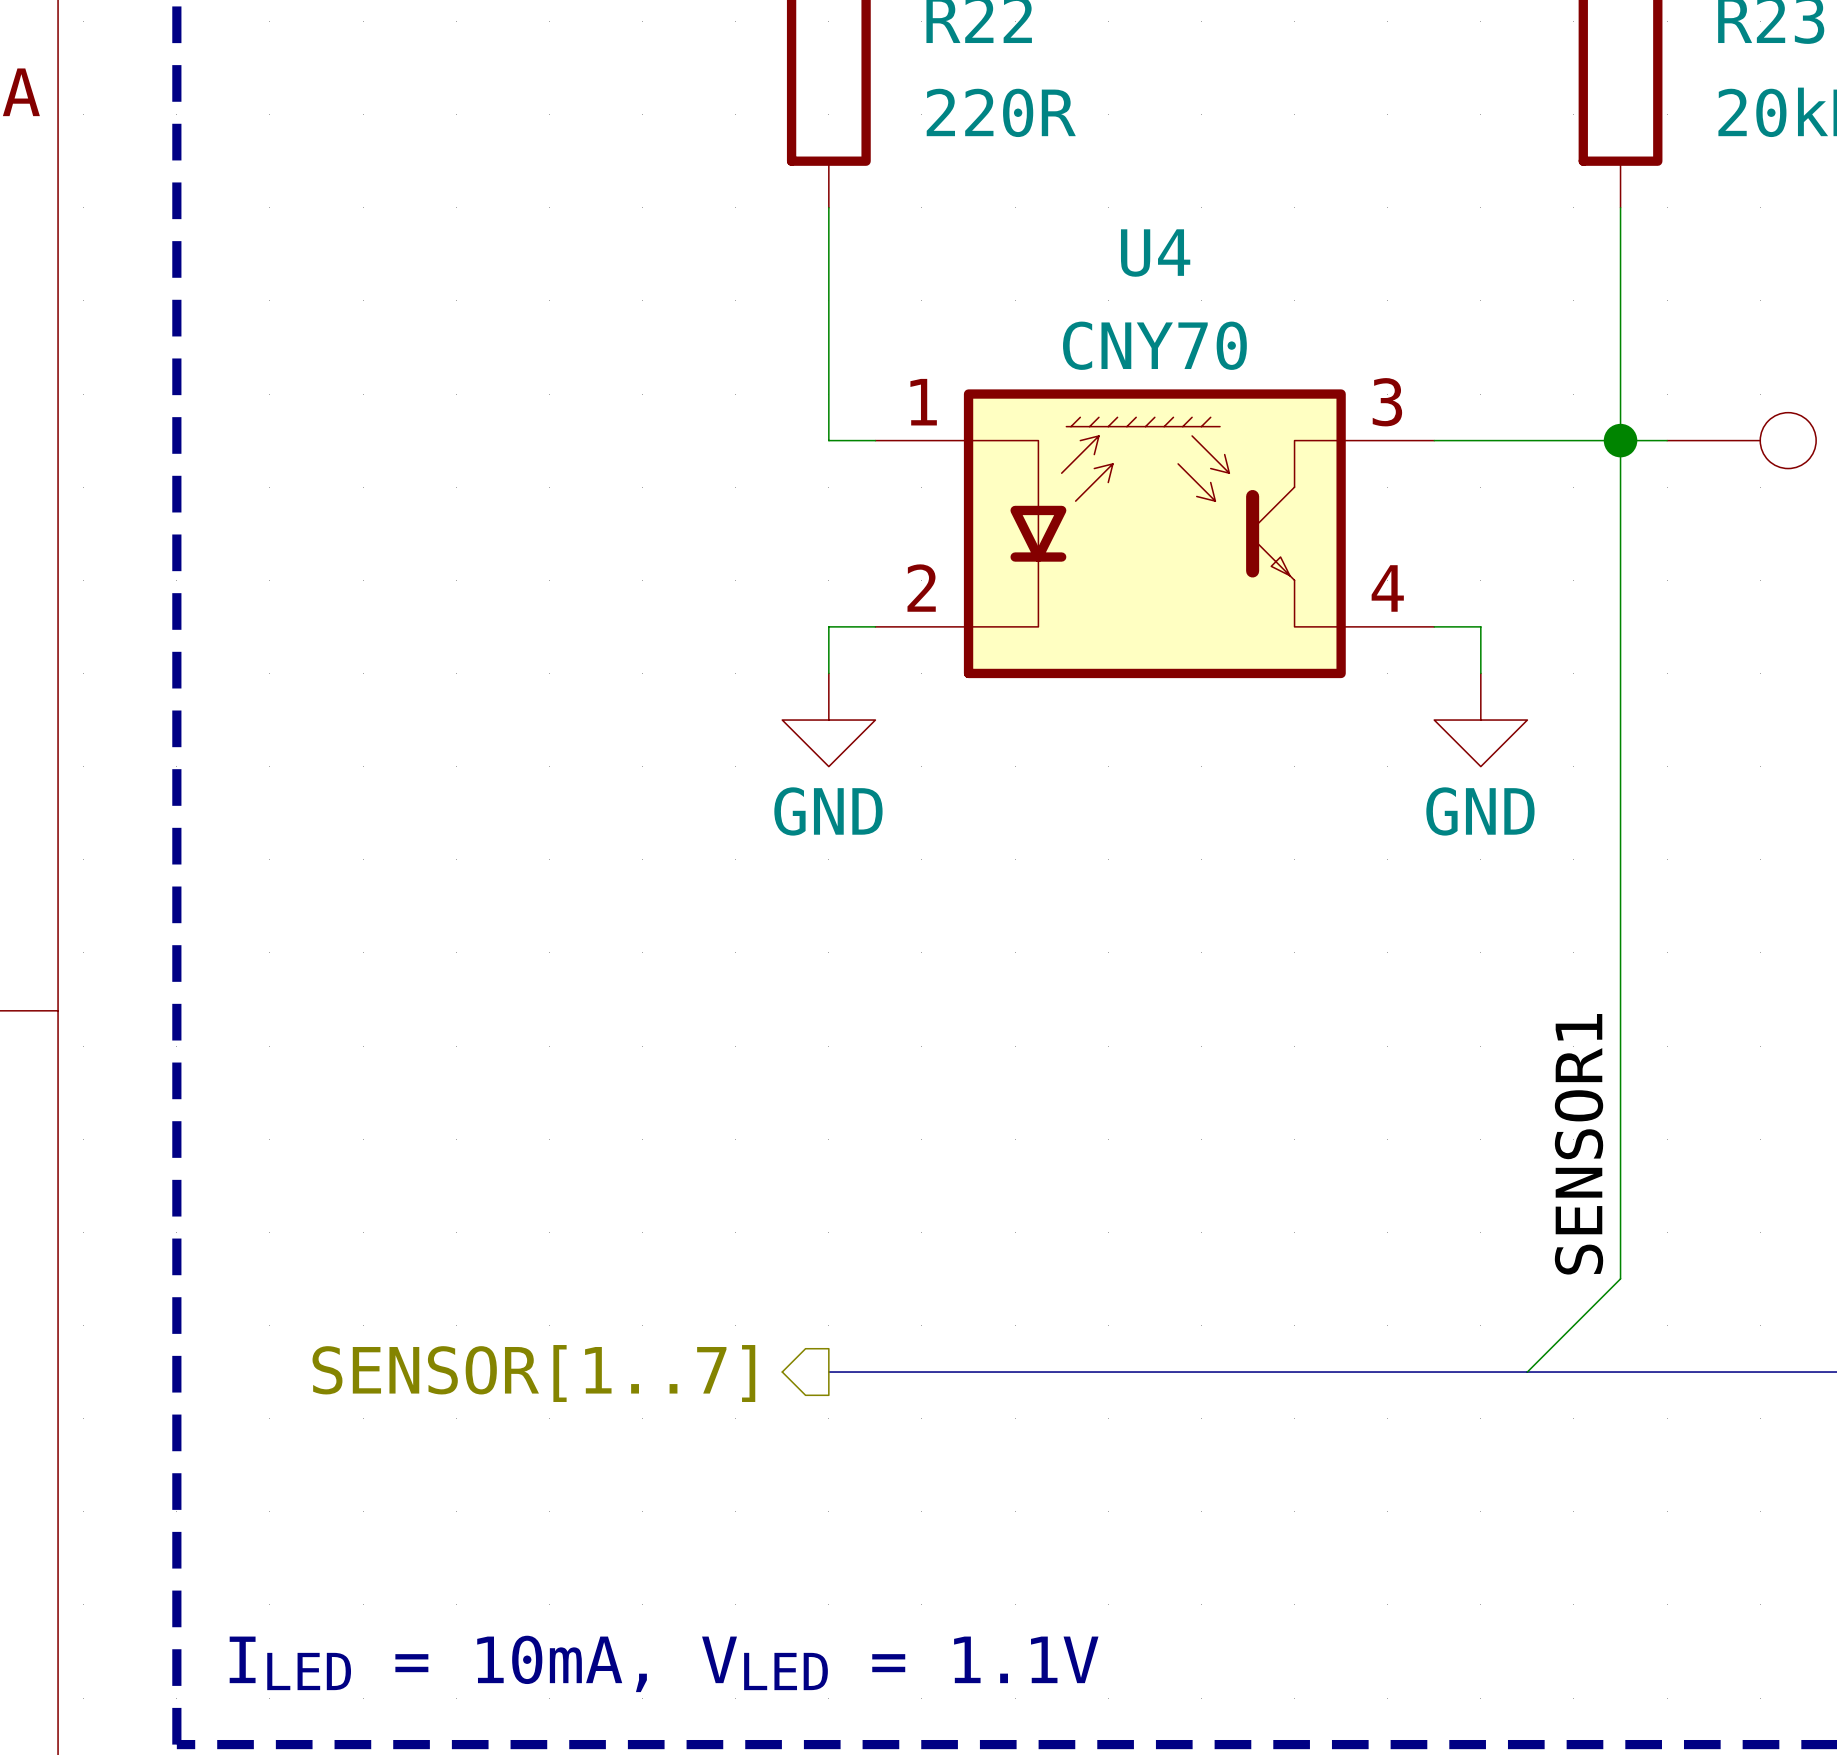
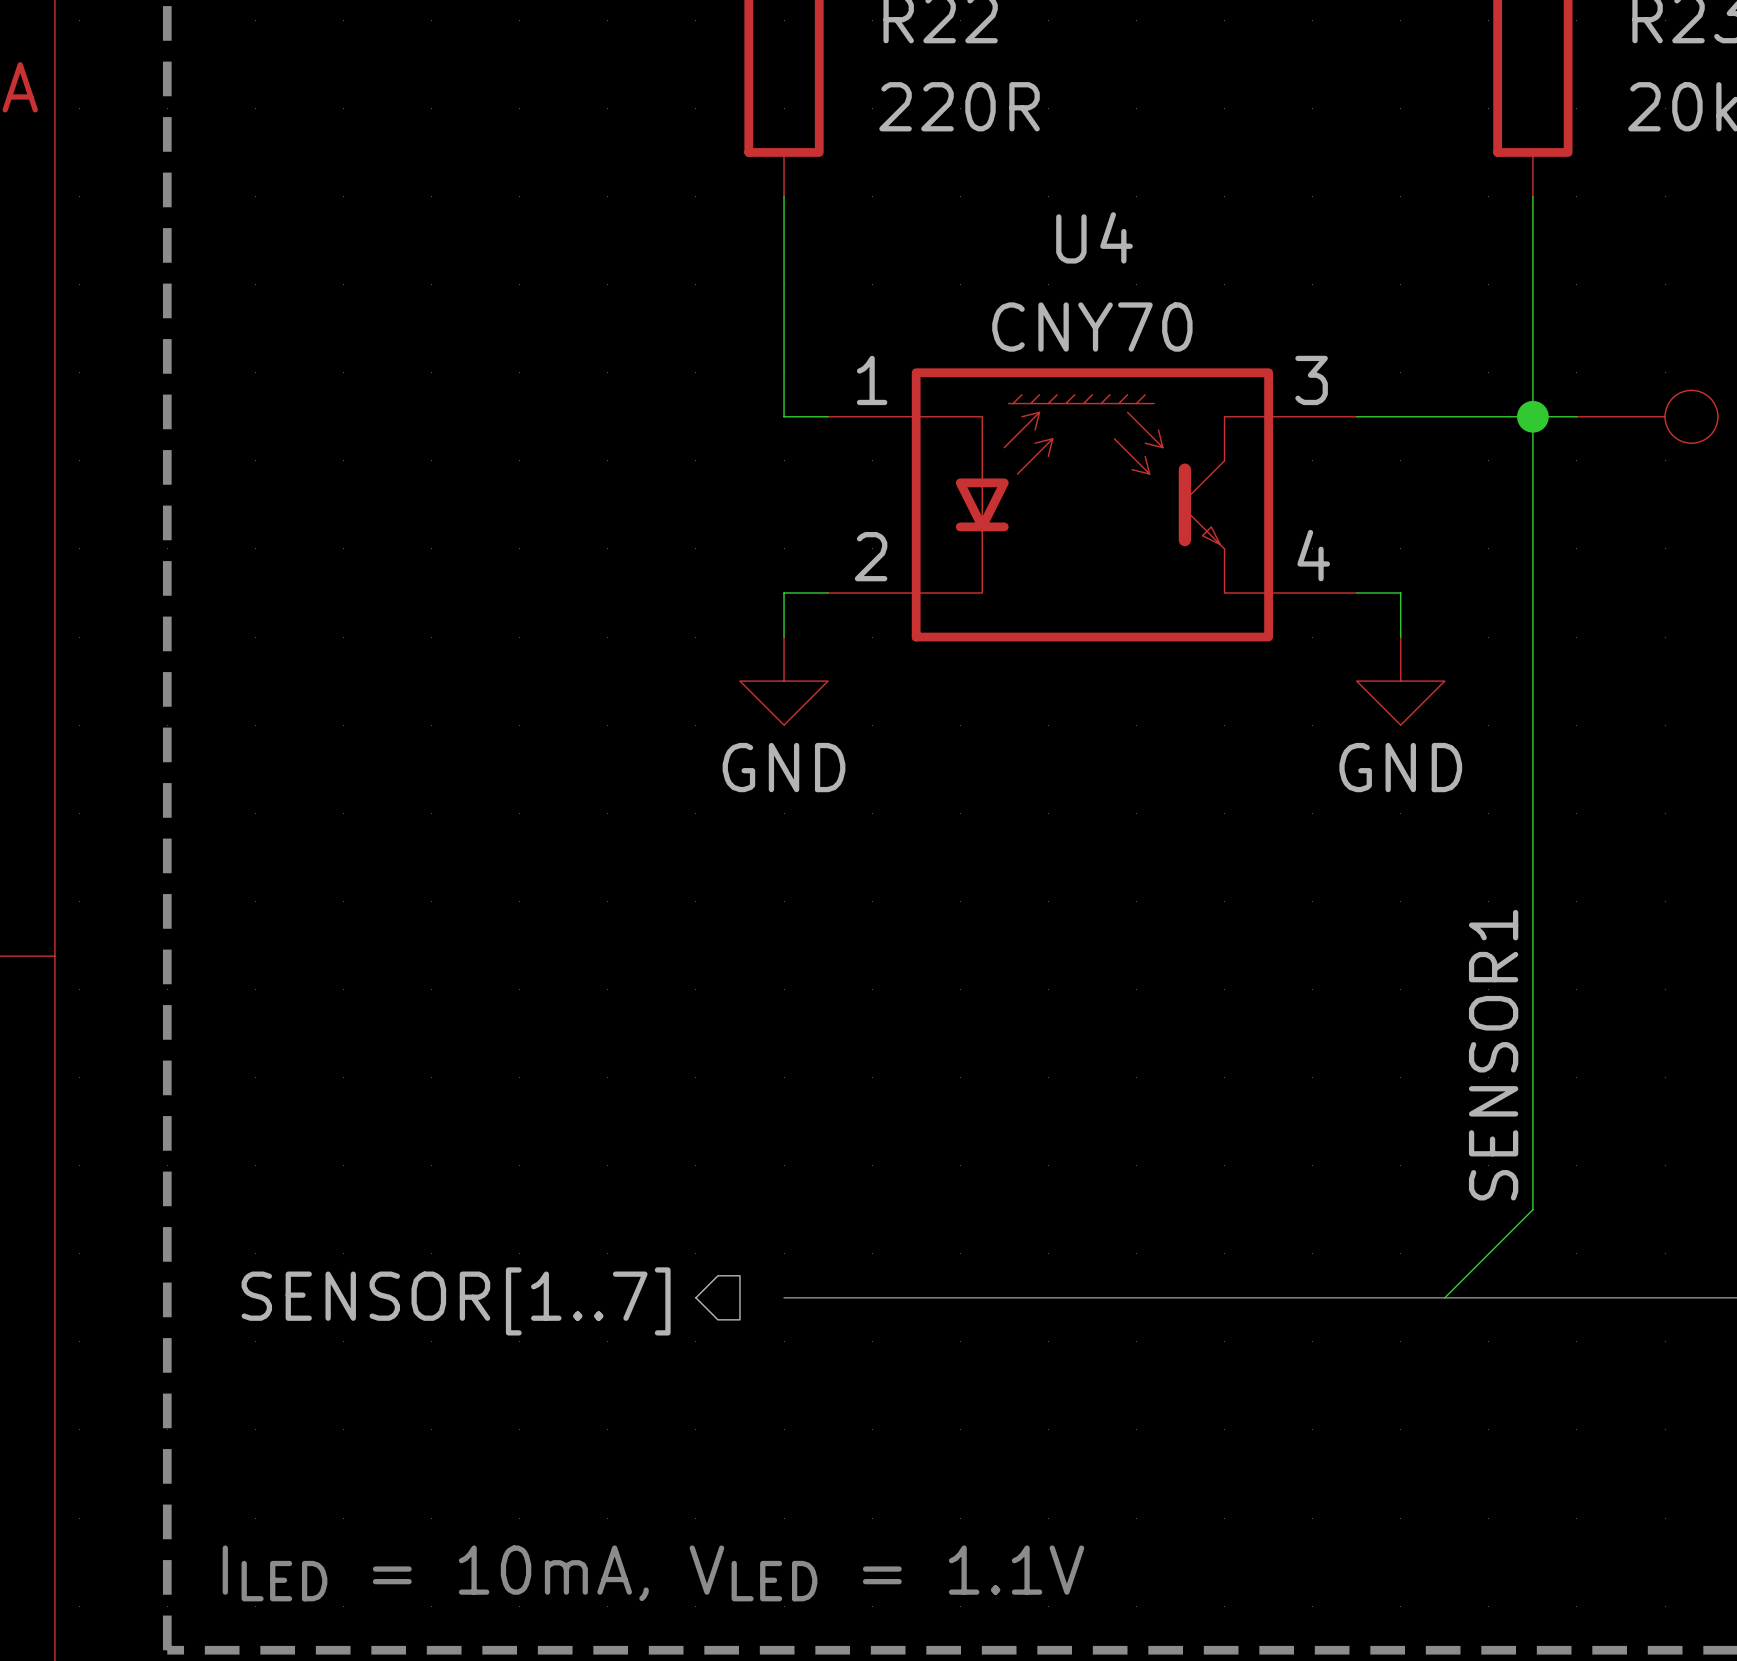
hierarchical label position: SENSOR[1..7] (533, 1373) -> SENSOR[1..7] (456, 1301)

